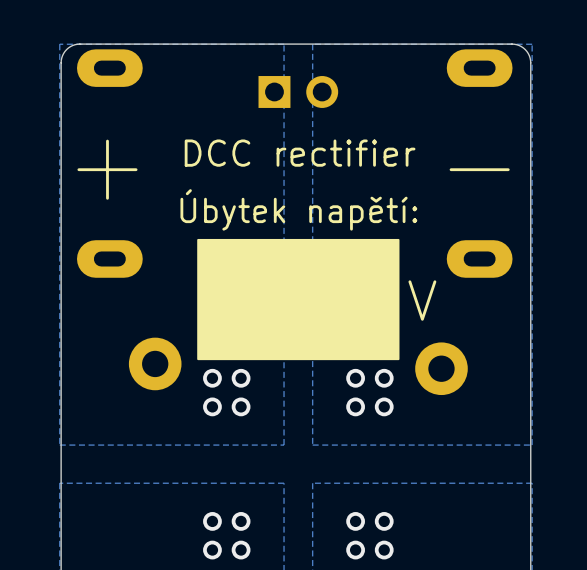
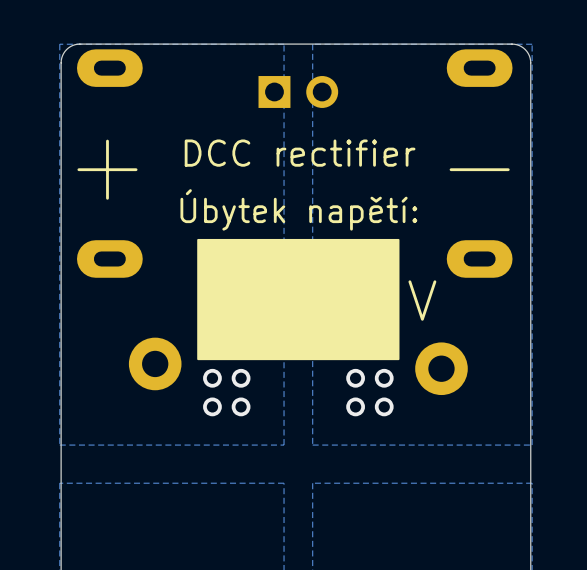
via: (212, 521) -> none
via: (241, 521) -> none
via: (355, 521) -> none
via: (384, 521) -> none
via: (212, 550) -> none
via: (241, 550) -> none
via: (355, 550) -> none
via: (384, 550) -> none

